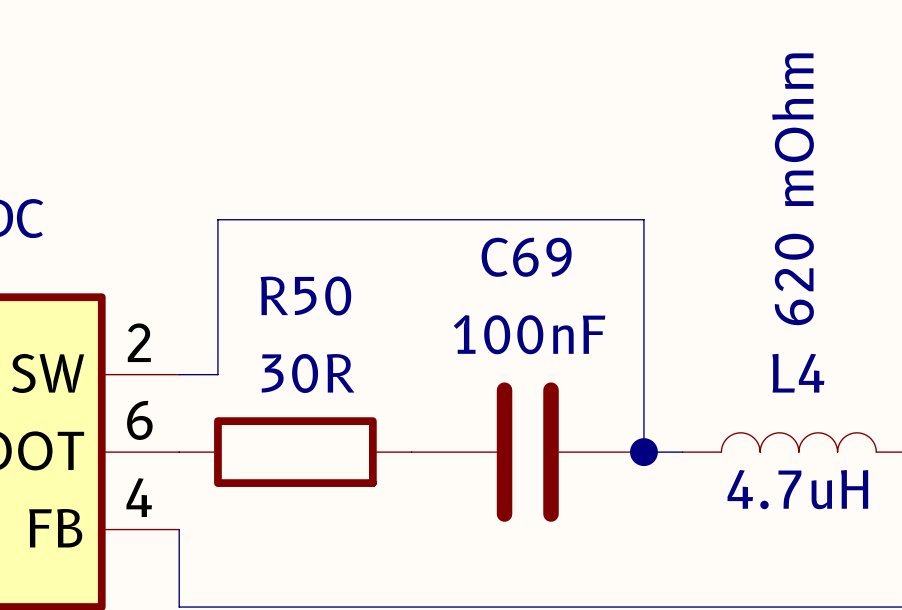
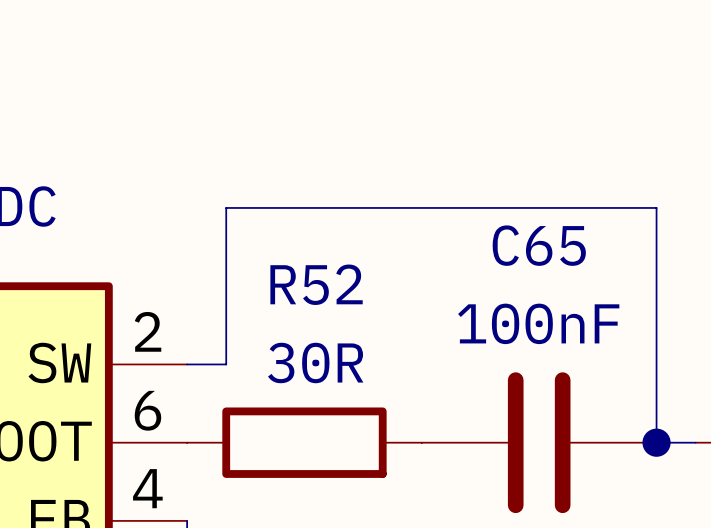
C69 name: C69 (526, 257) -> C65 (539, 245)
R50 name: R50 (305, 296) -> R52 (316, 284)

